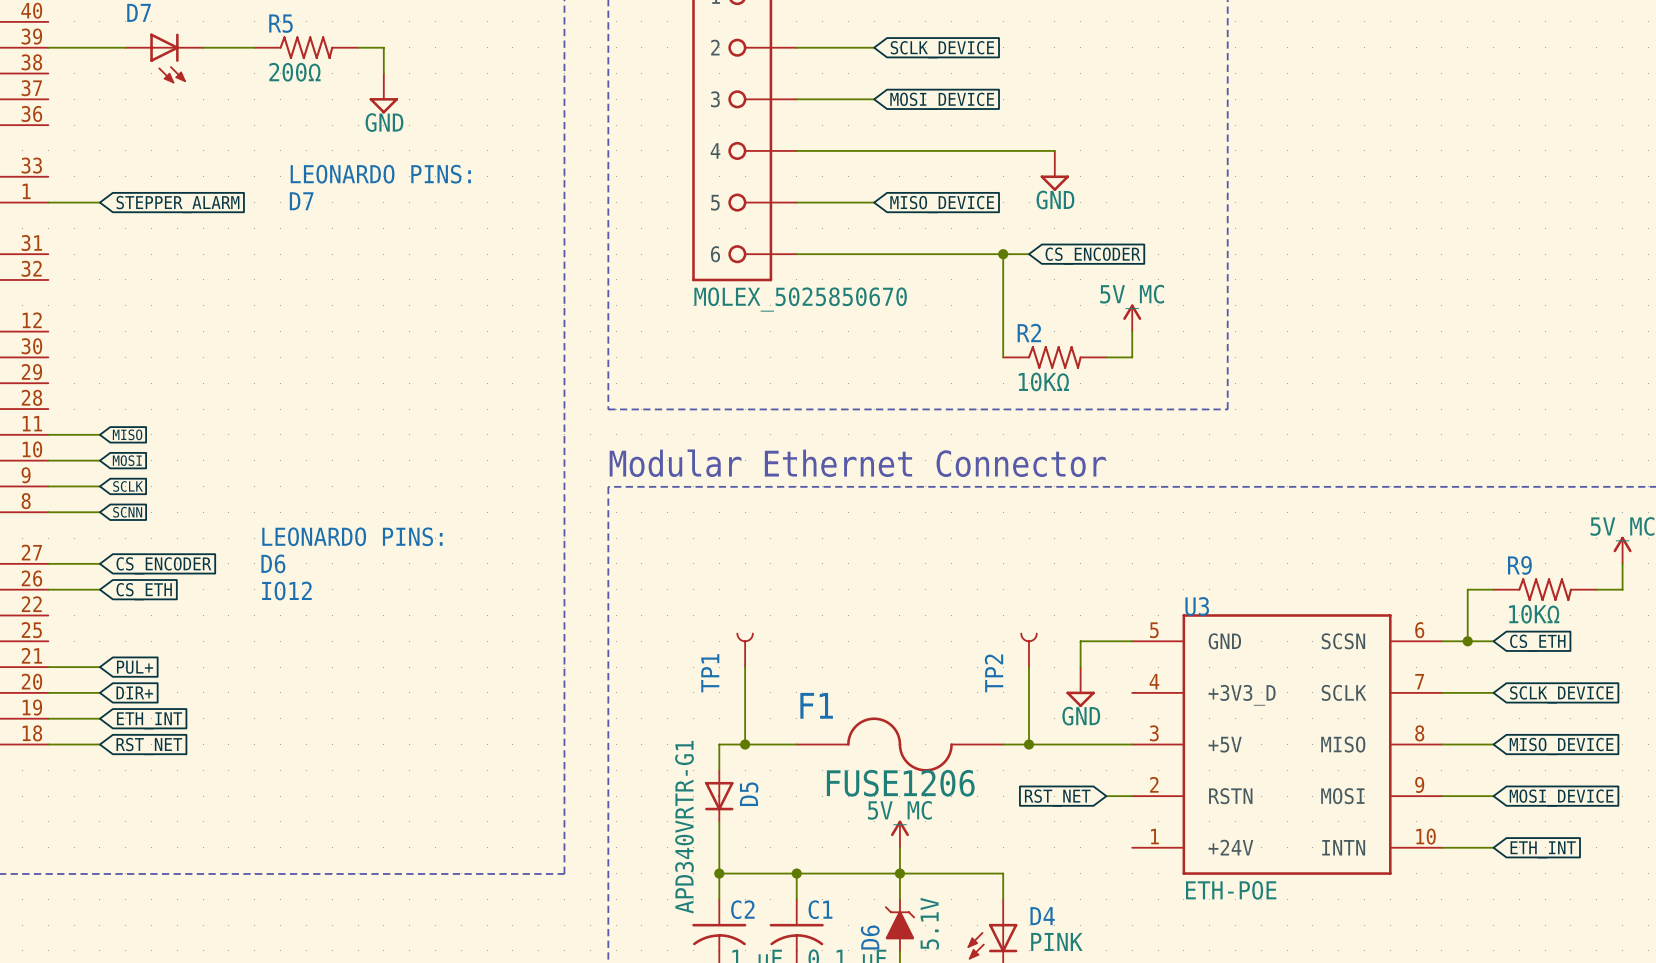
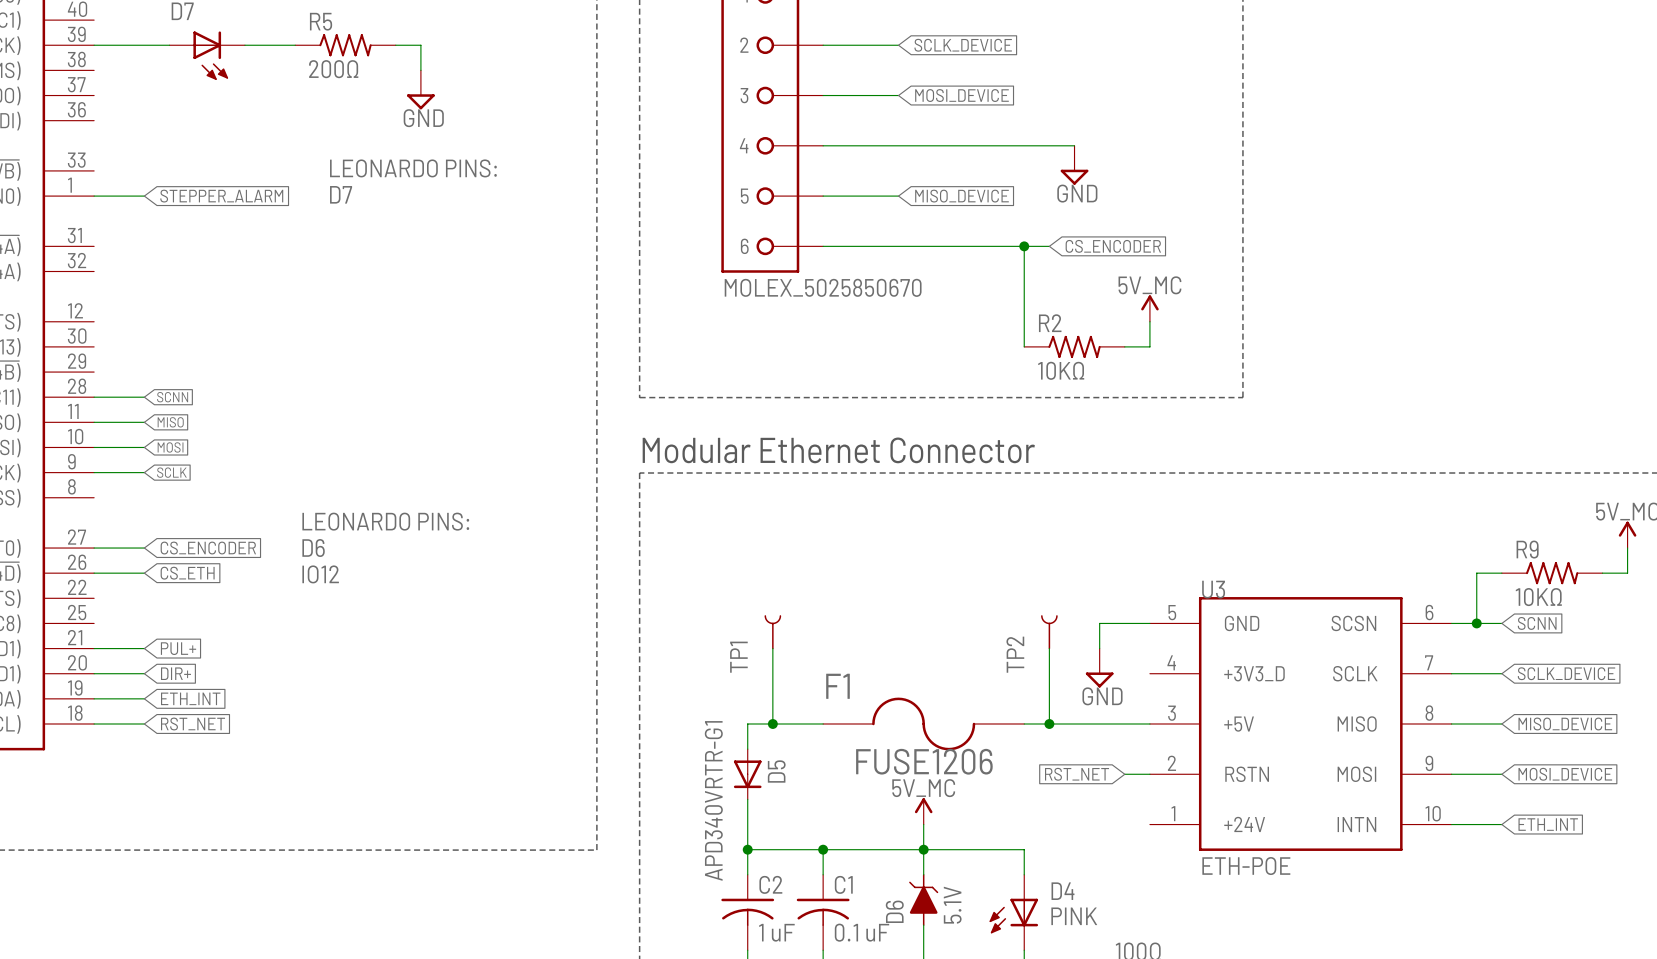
wire: (48, 512) (99, 512) -> (94, 397) (144, 397)
global label position: SCNN (127, 512) -> SCNN (172, 397)
global label: CS_ETH (1537, 643) -> SCNN (1537, 623)

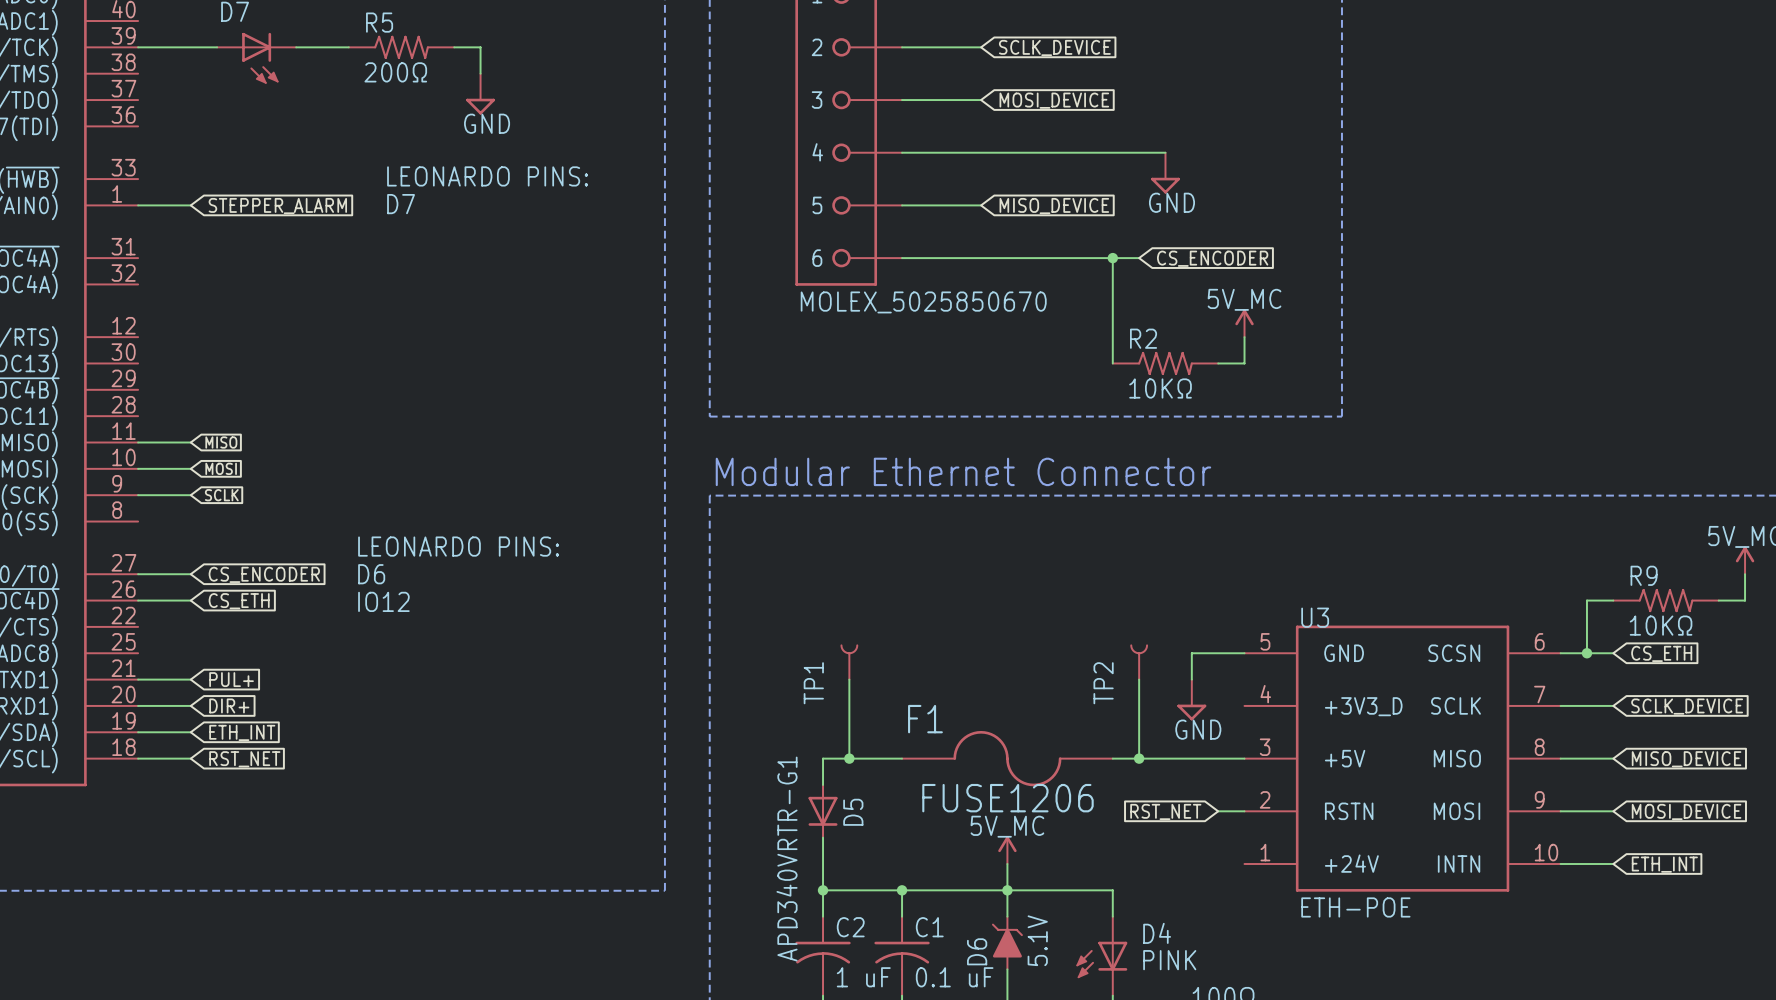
wire: (94, 397) (144, 397) -> none
global label: SCNN (172, 397) -> none
global label: SCNN (1537, 623) -> CS_ETH (1661, 653)

